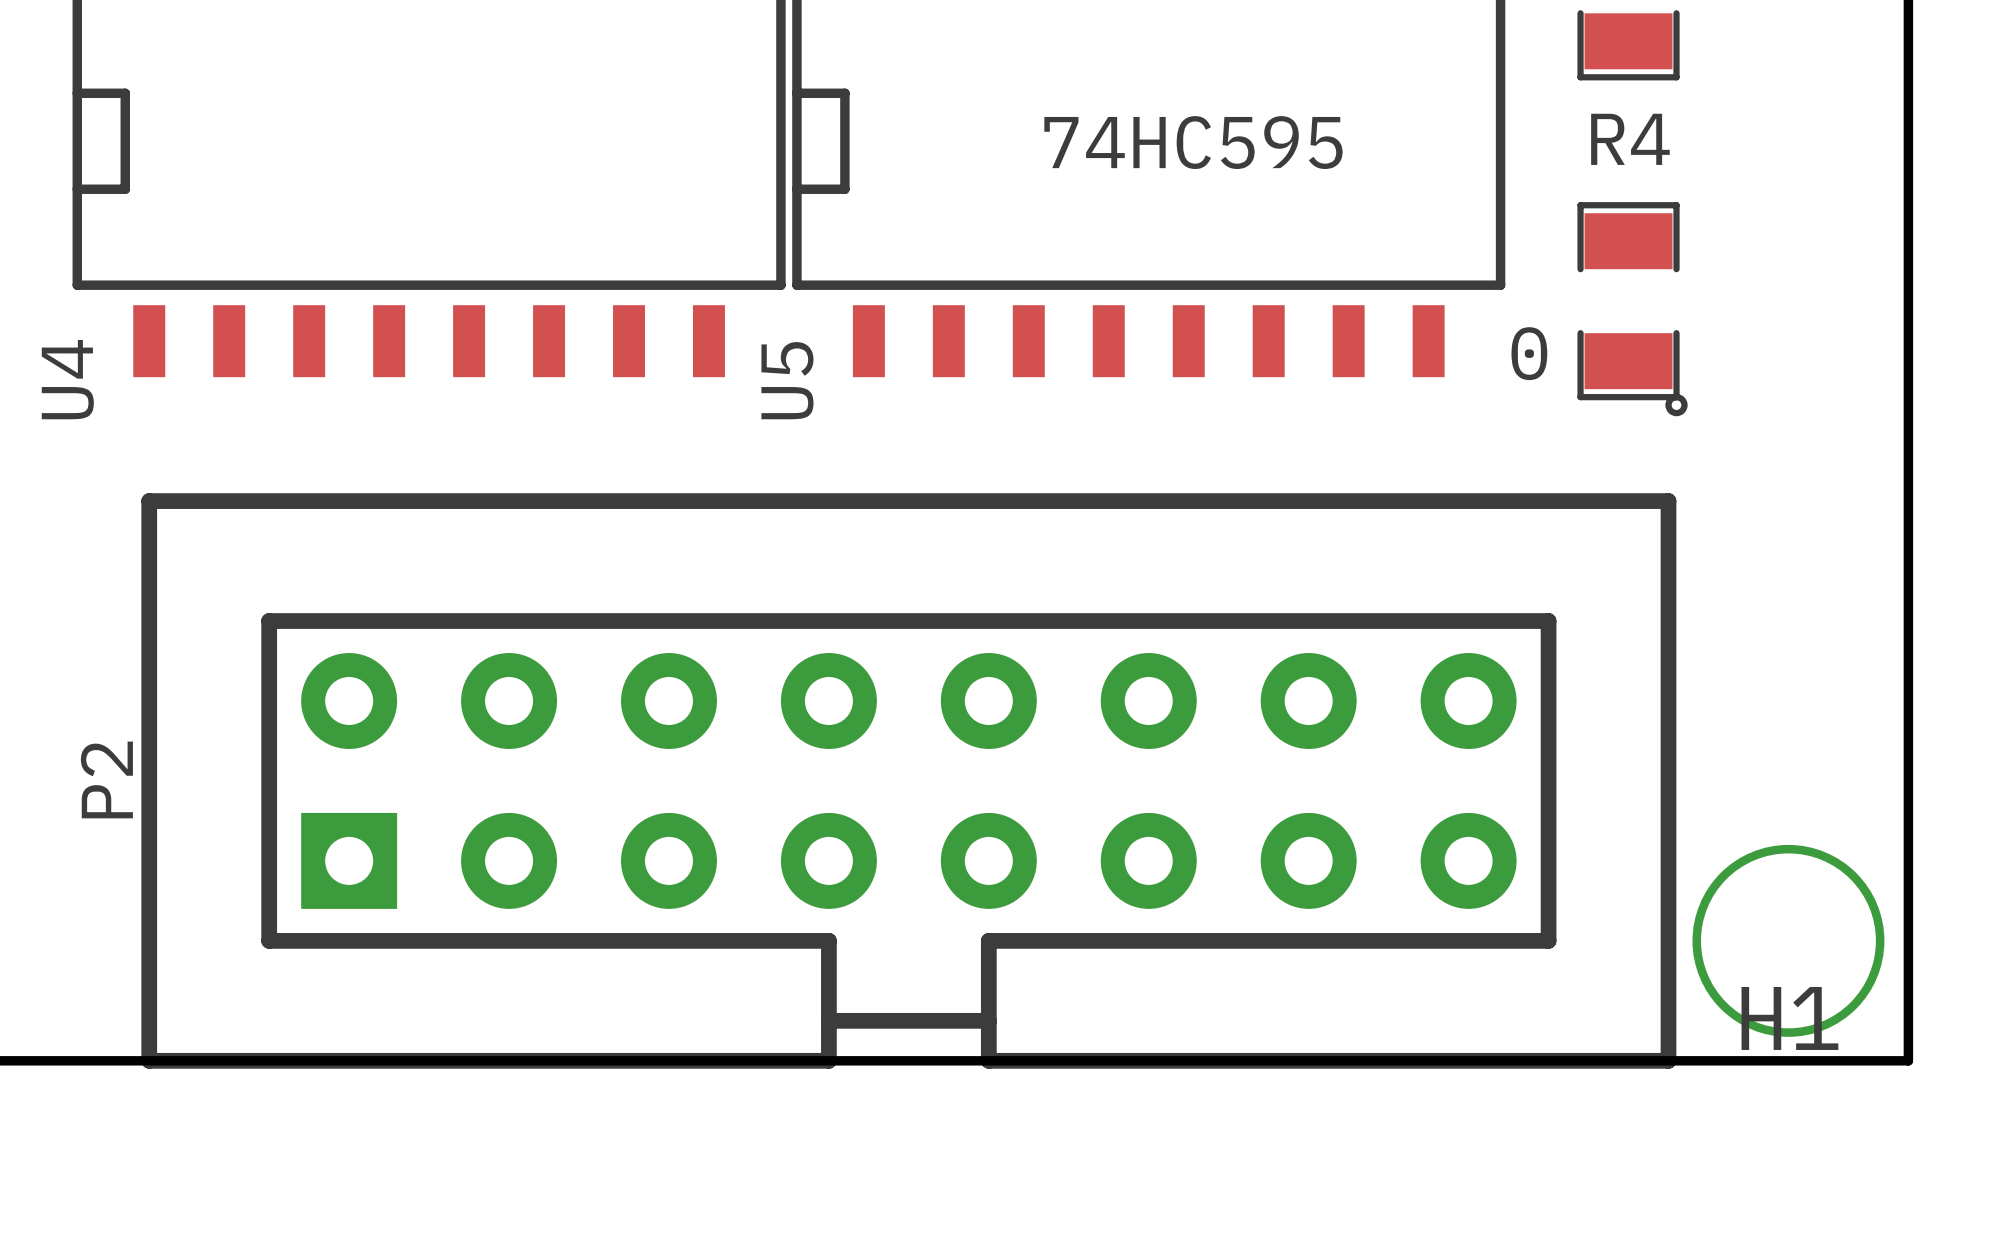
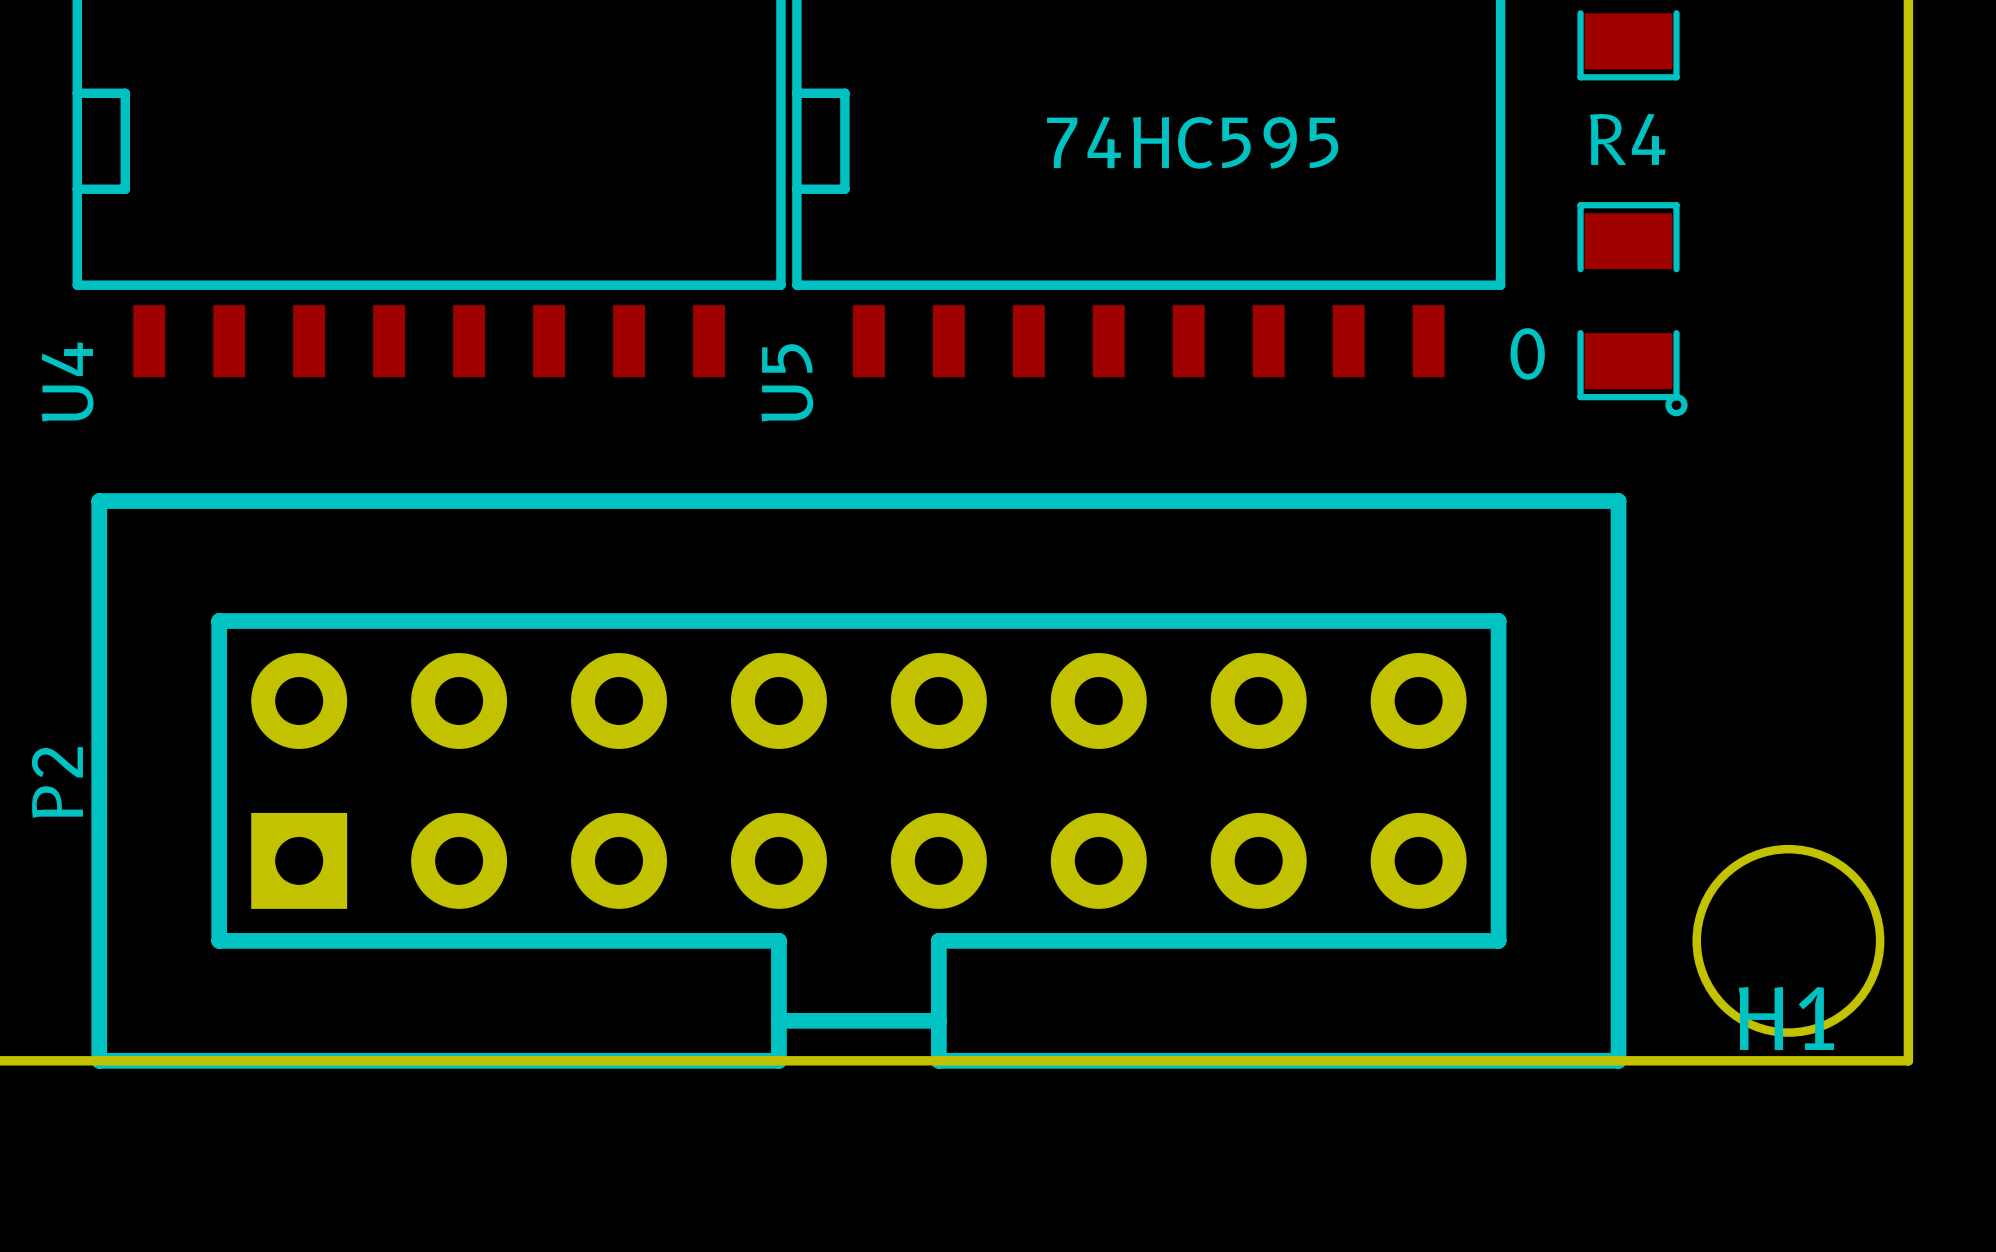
P2 position: (908, 780) -> (858, 780)

